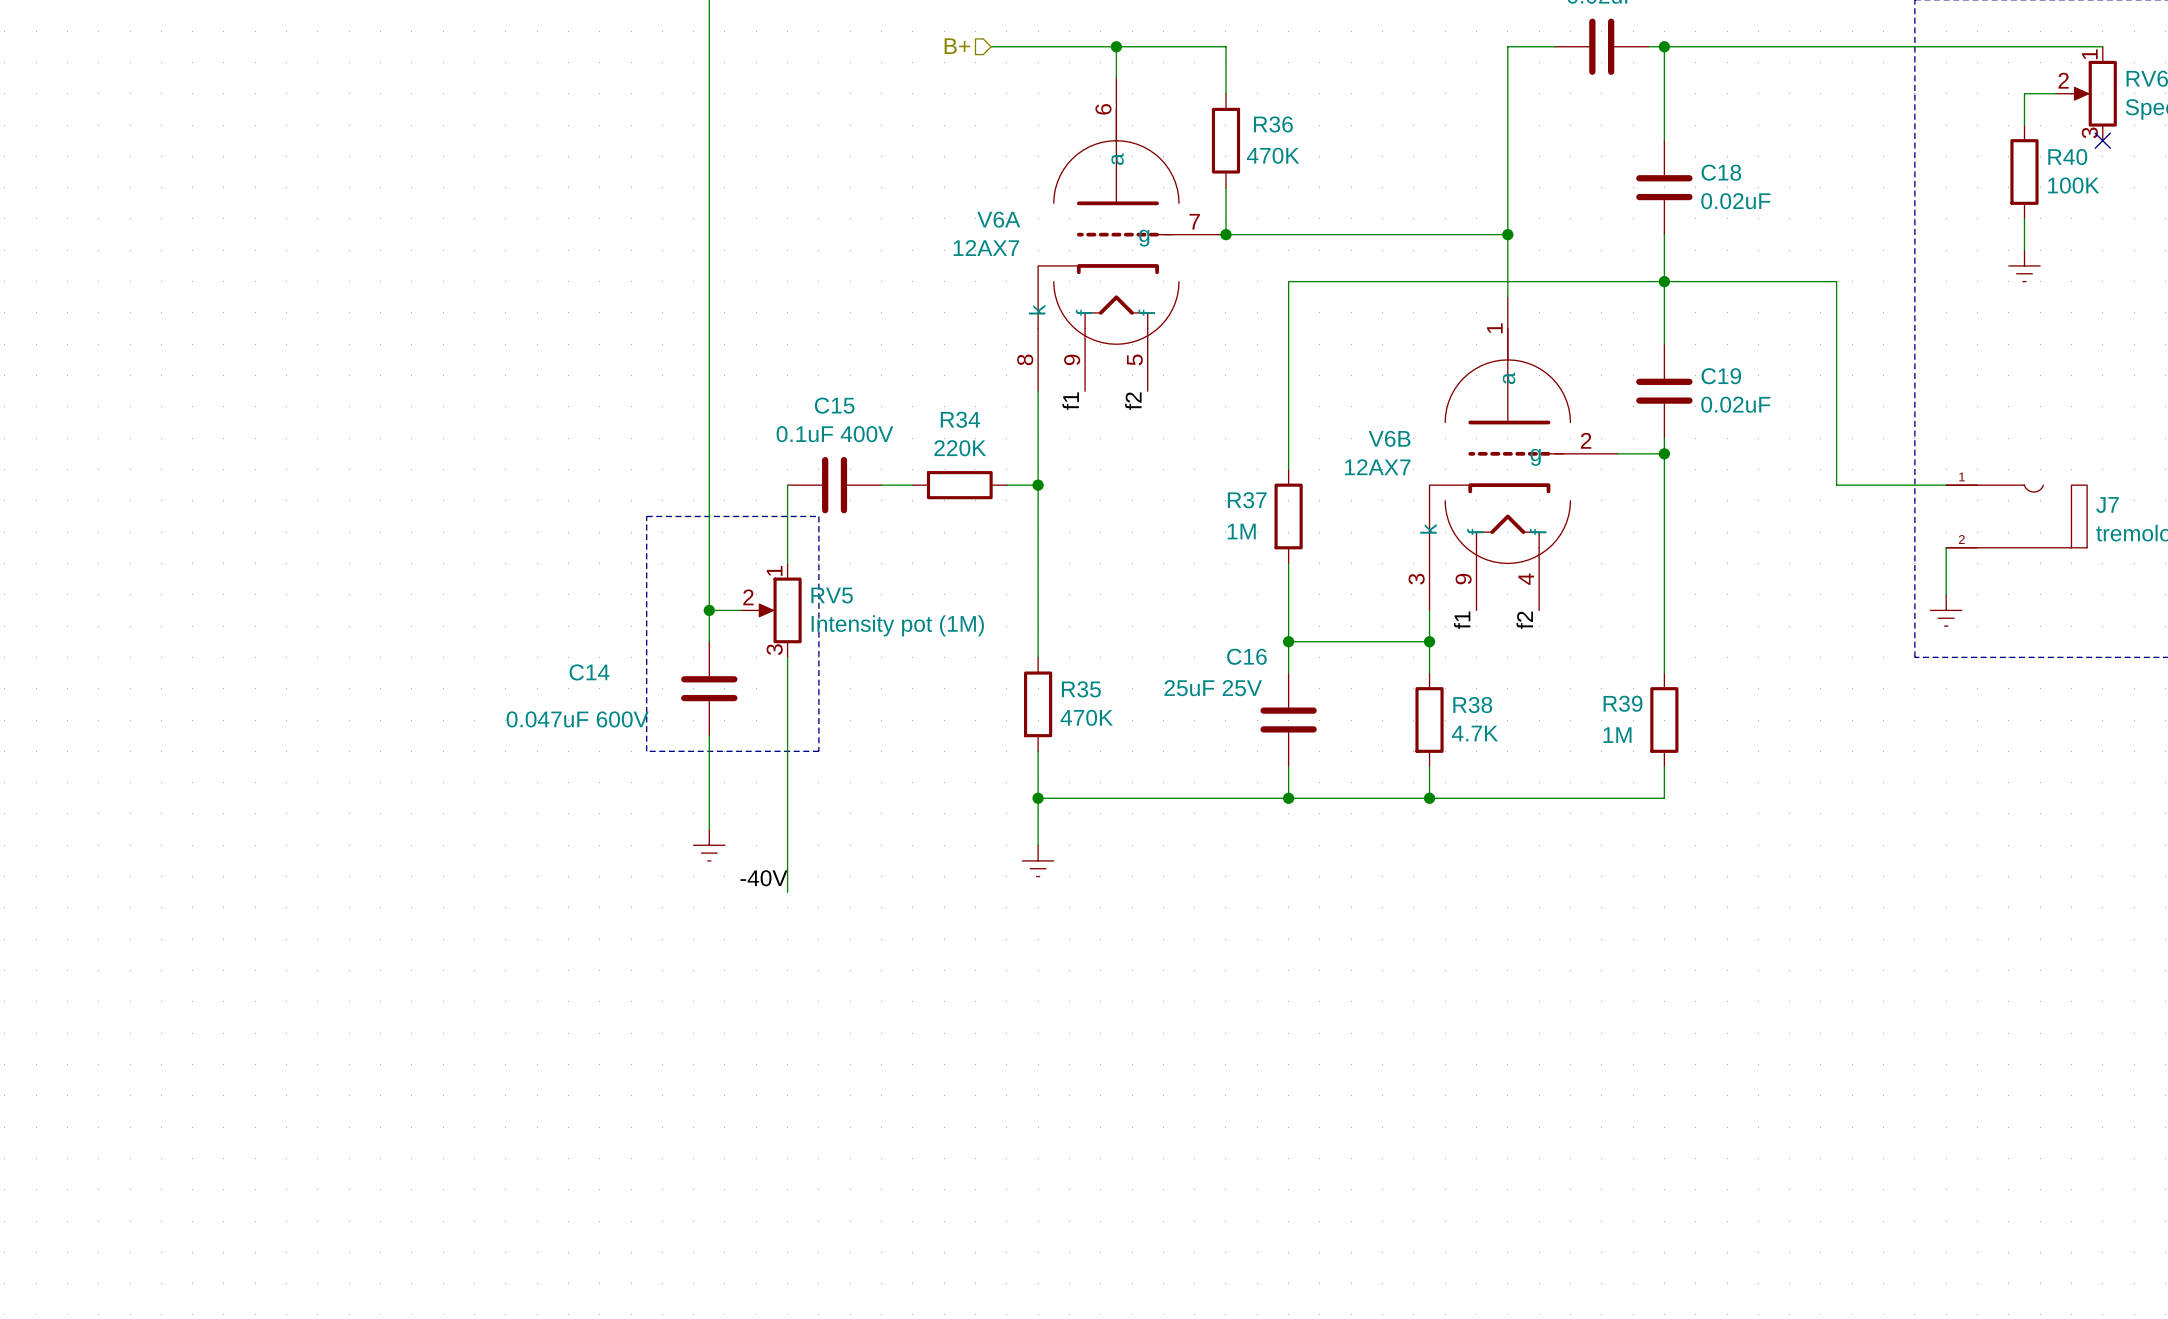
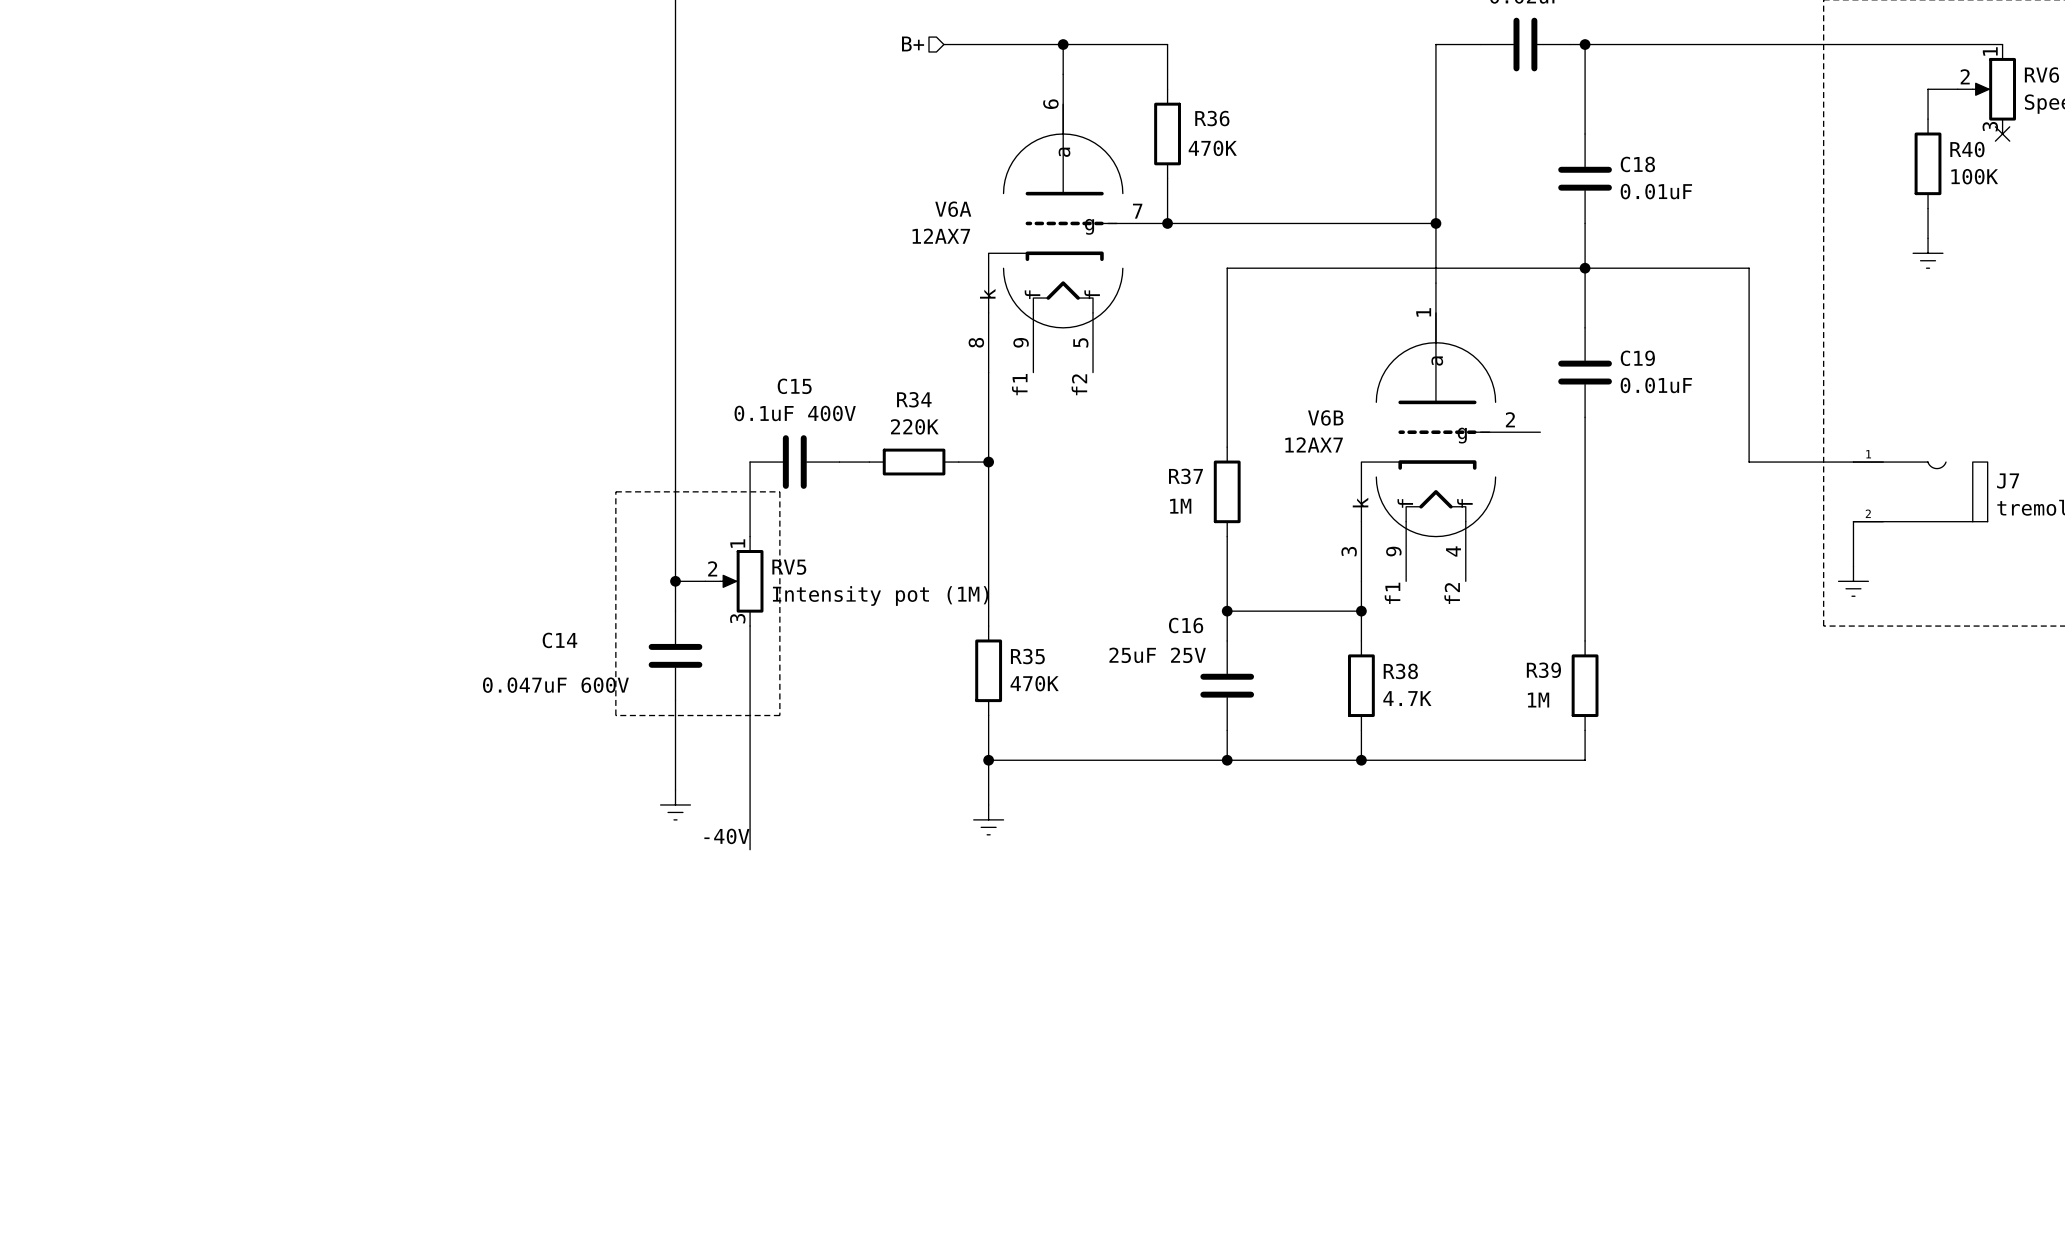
C18 value: 0.02uF (1735, 201) -> 0.01uF (1656, 191)
C19 value: 0.02uF (1735, 404) -> 0.01uF (1656, 385)
wire: (1617, 453) (1664, 453) -> none
junction: (1664, 453) -> none

